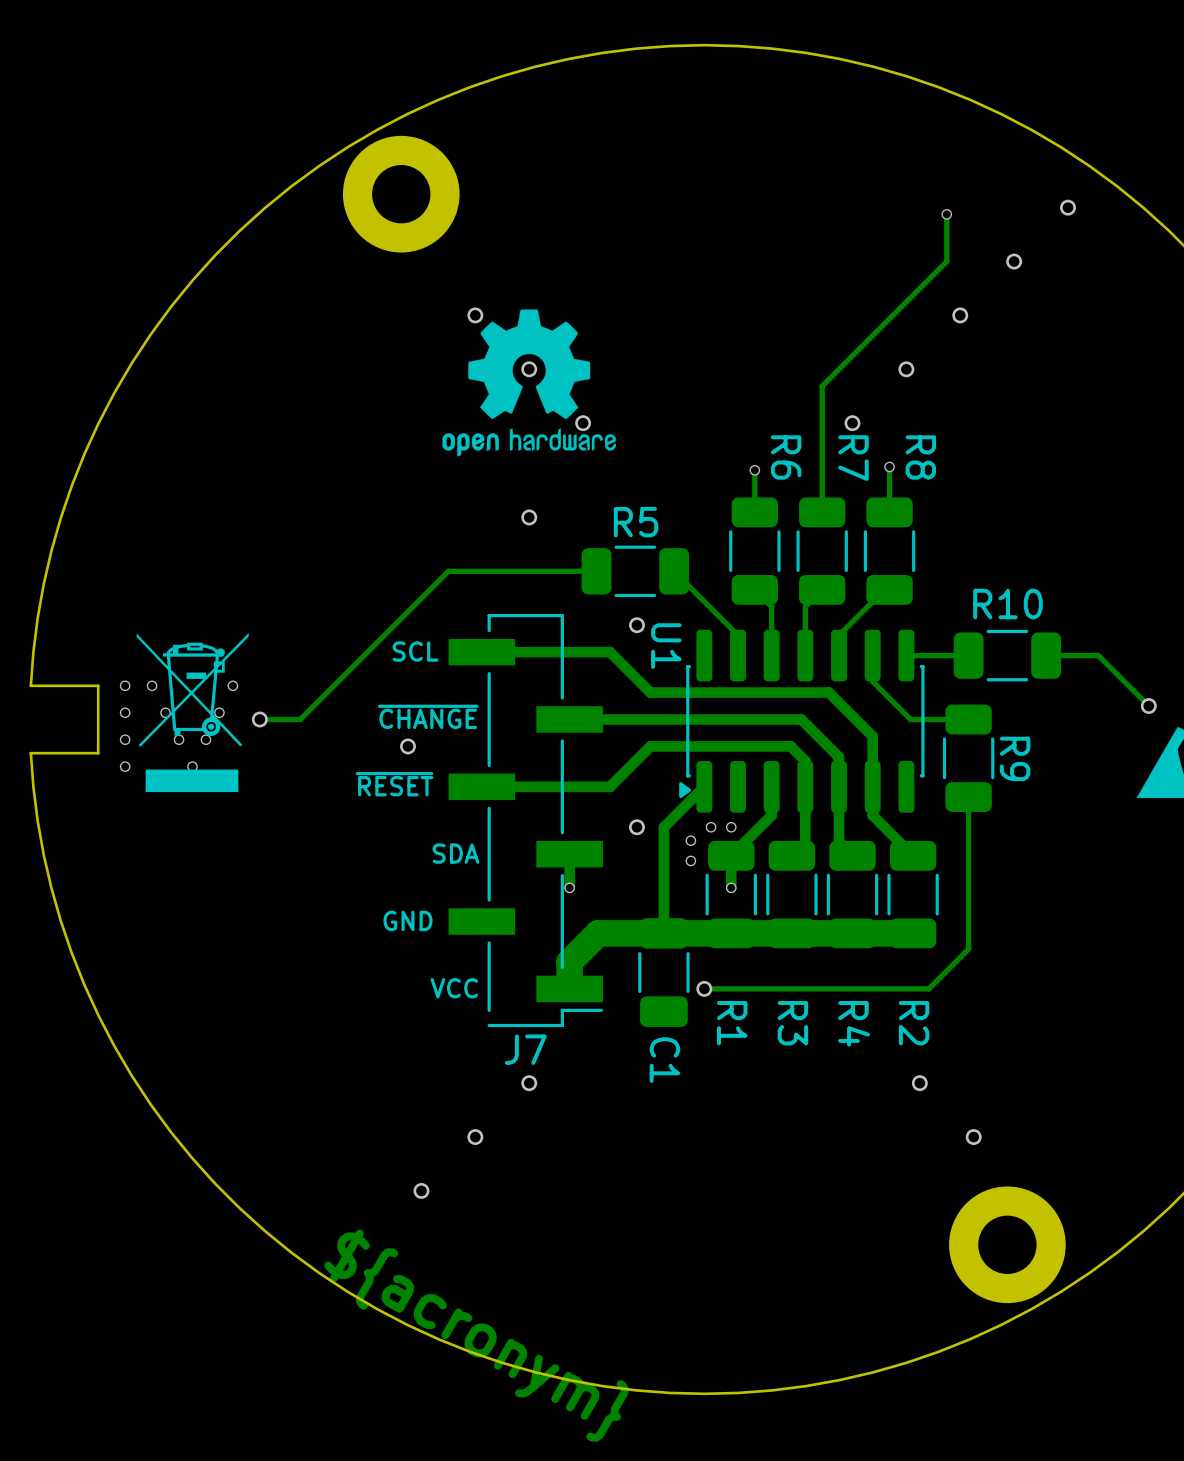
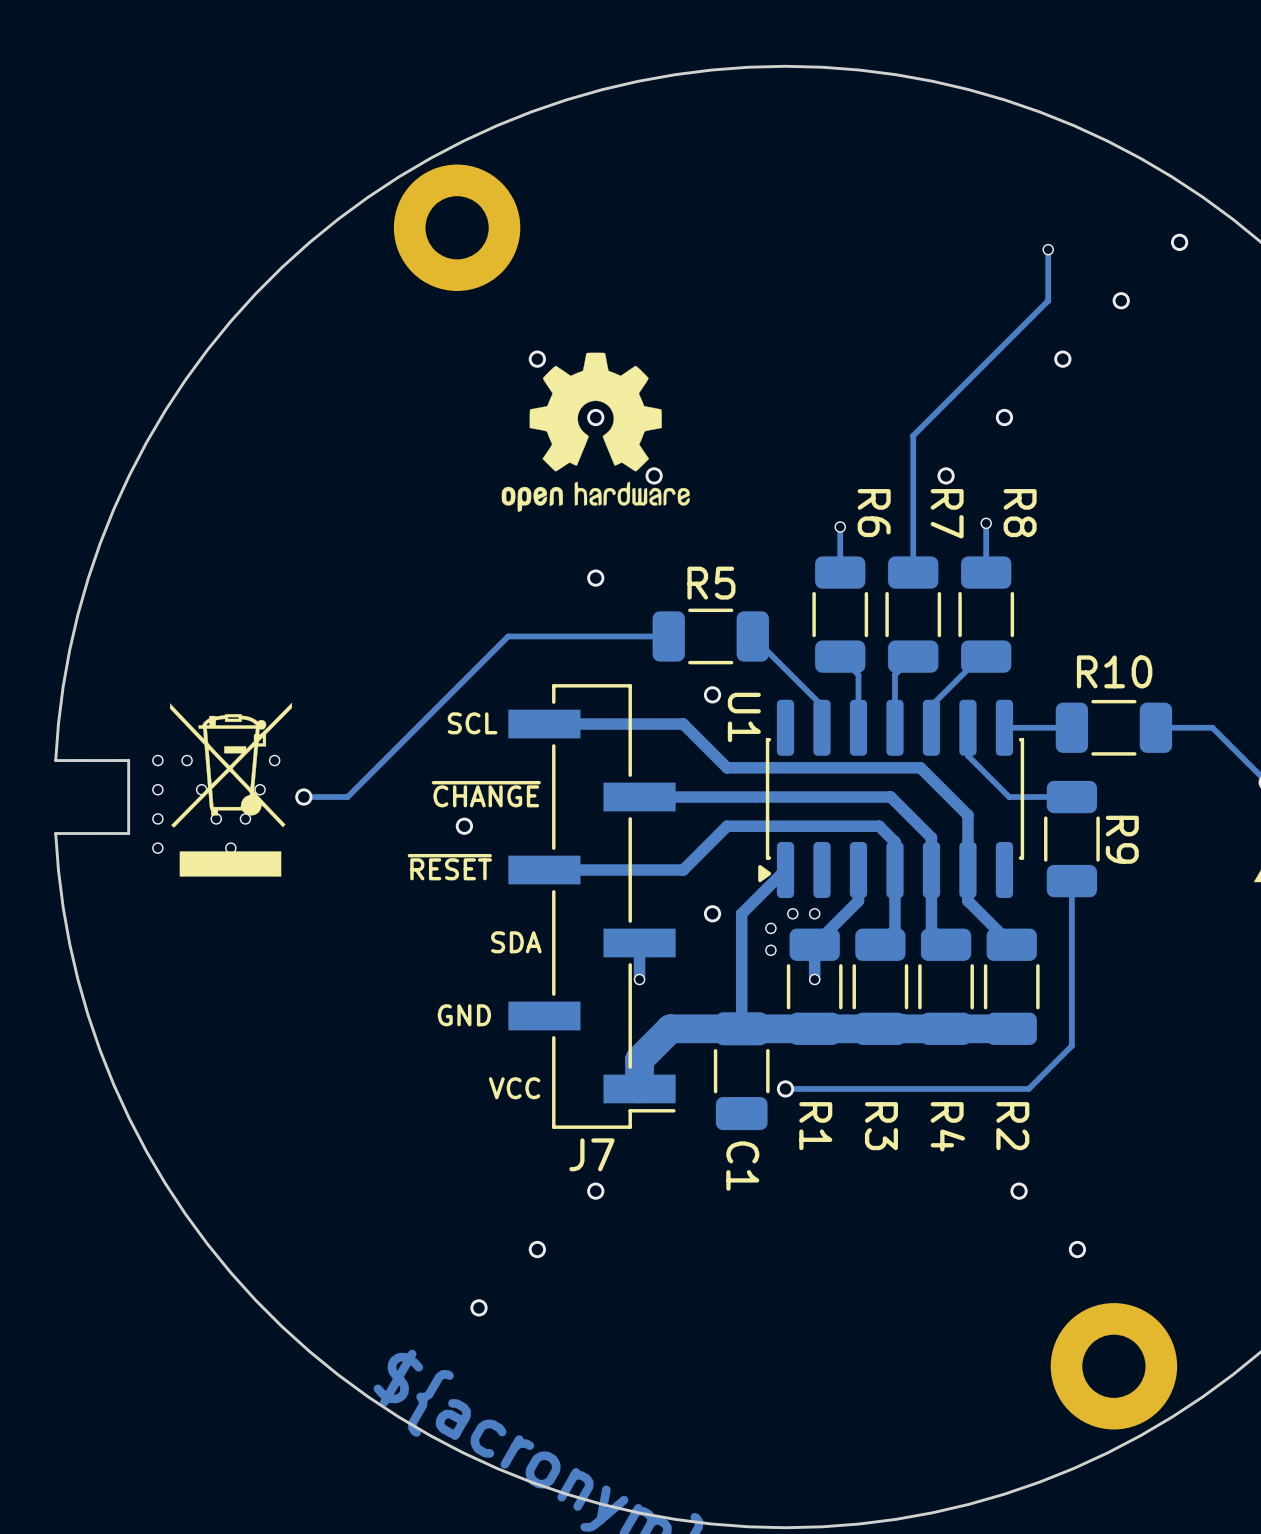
J7 footprint: [448, 613, 603, 1028] -> [508, 684, 676, 1129]
drawing shape: [136, 632, 249, 793] -> [170, 702, 293, 877]

